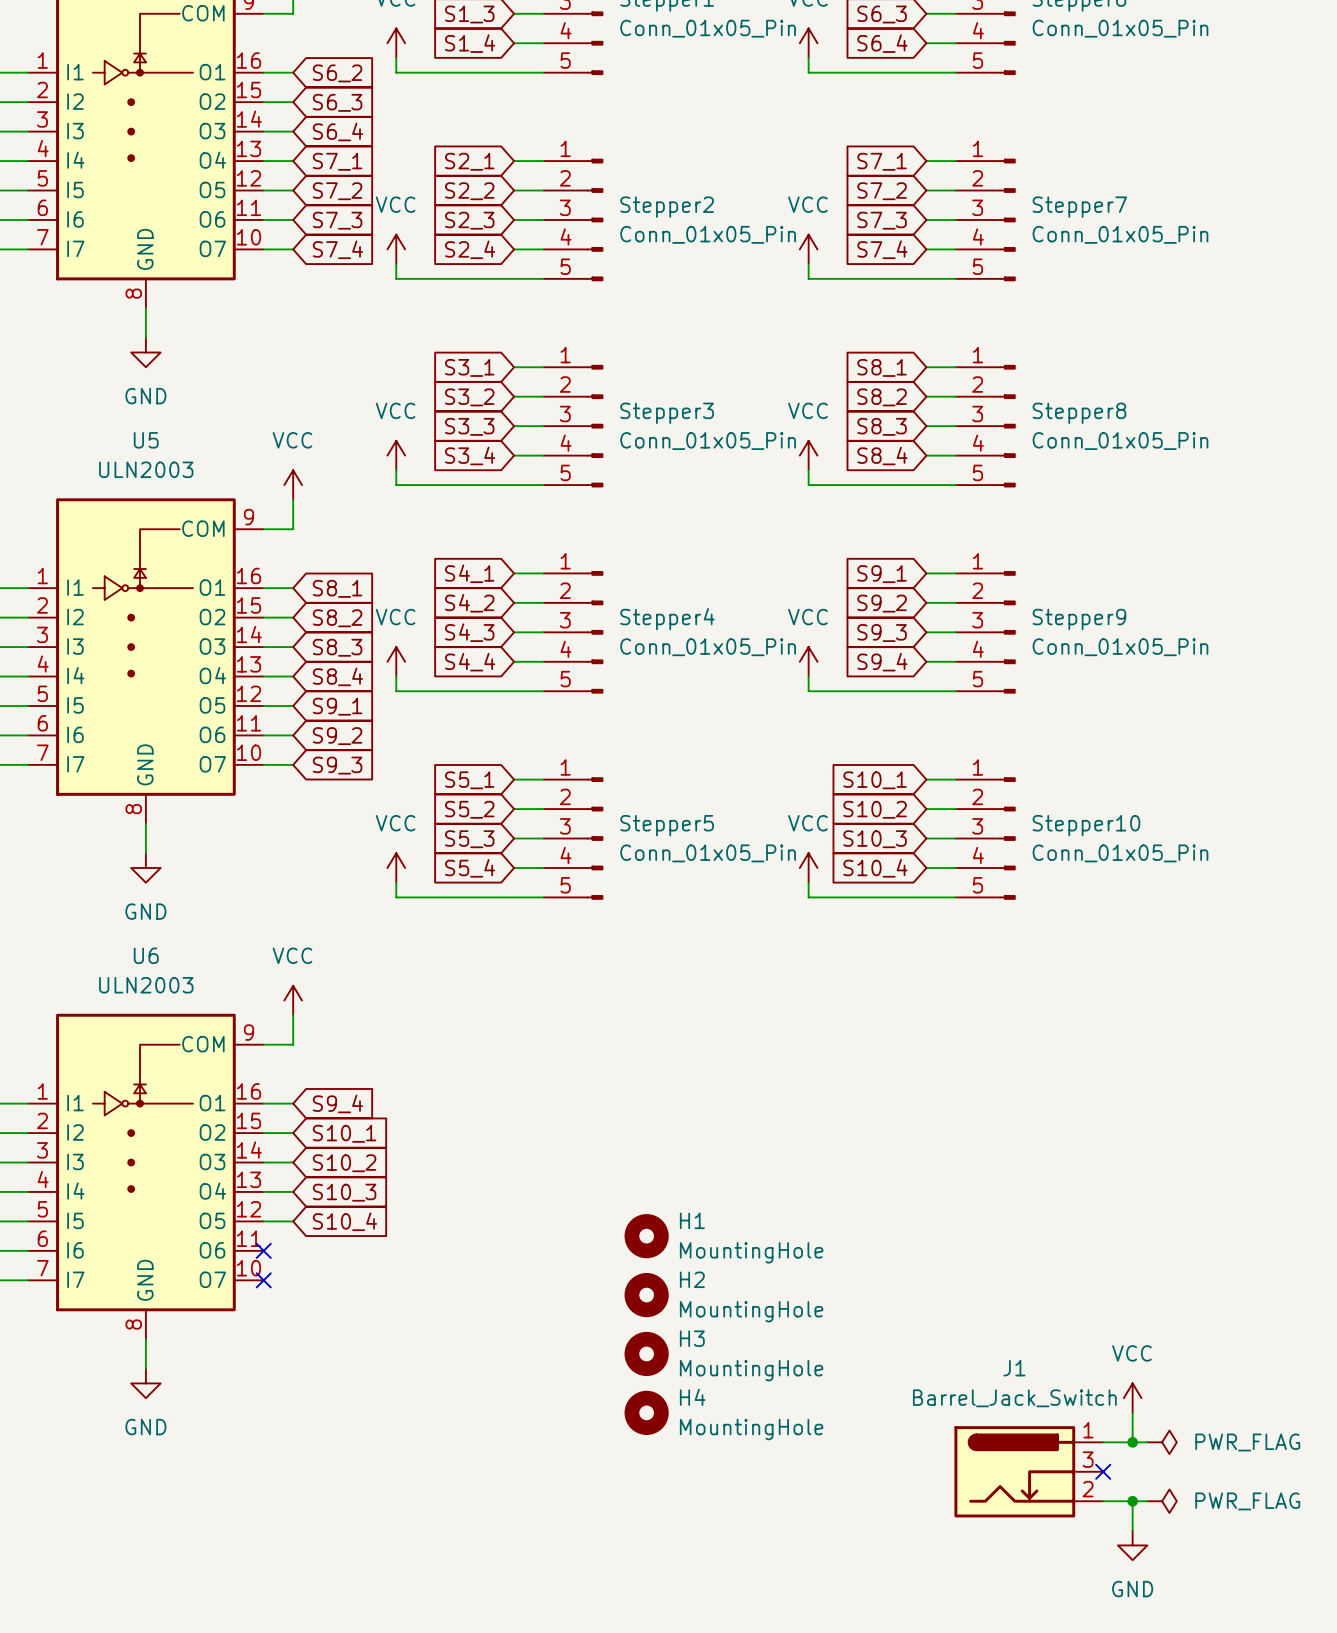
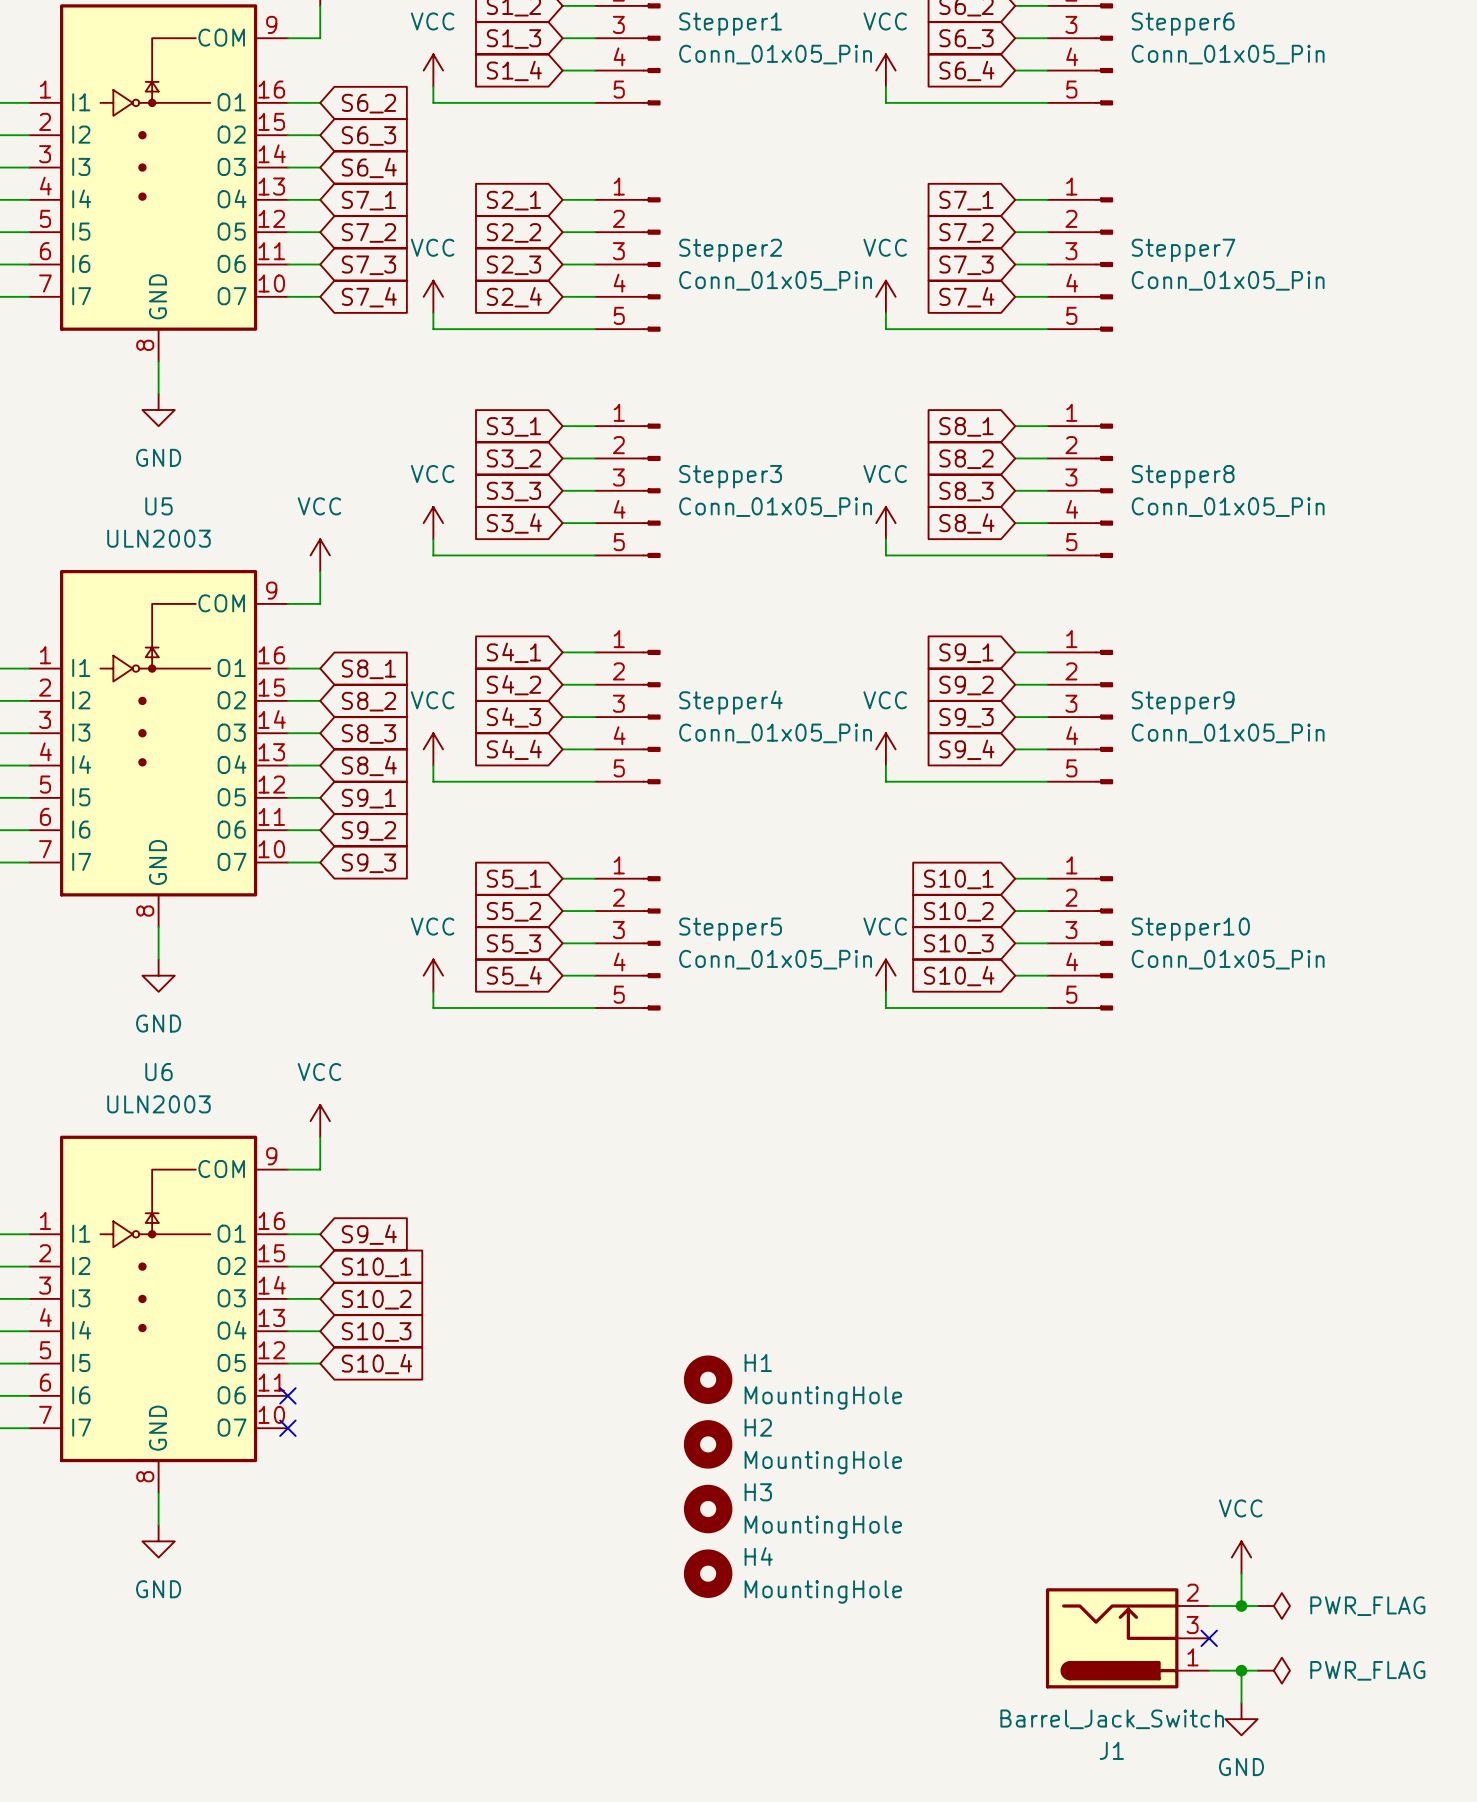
J1 flip: as is (1014, 1471) -> up-down (1112, 1638)

